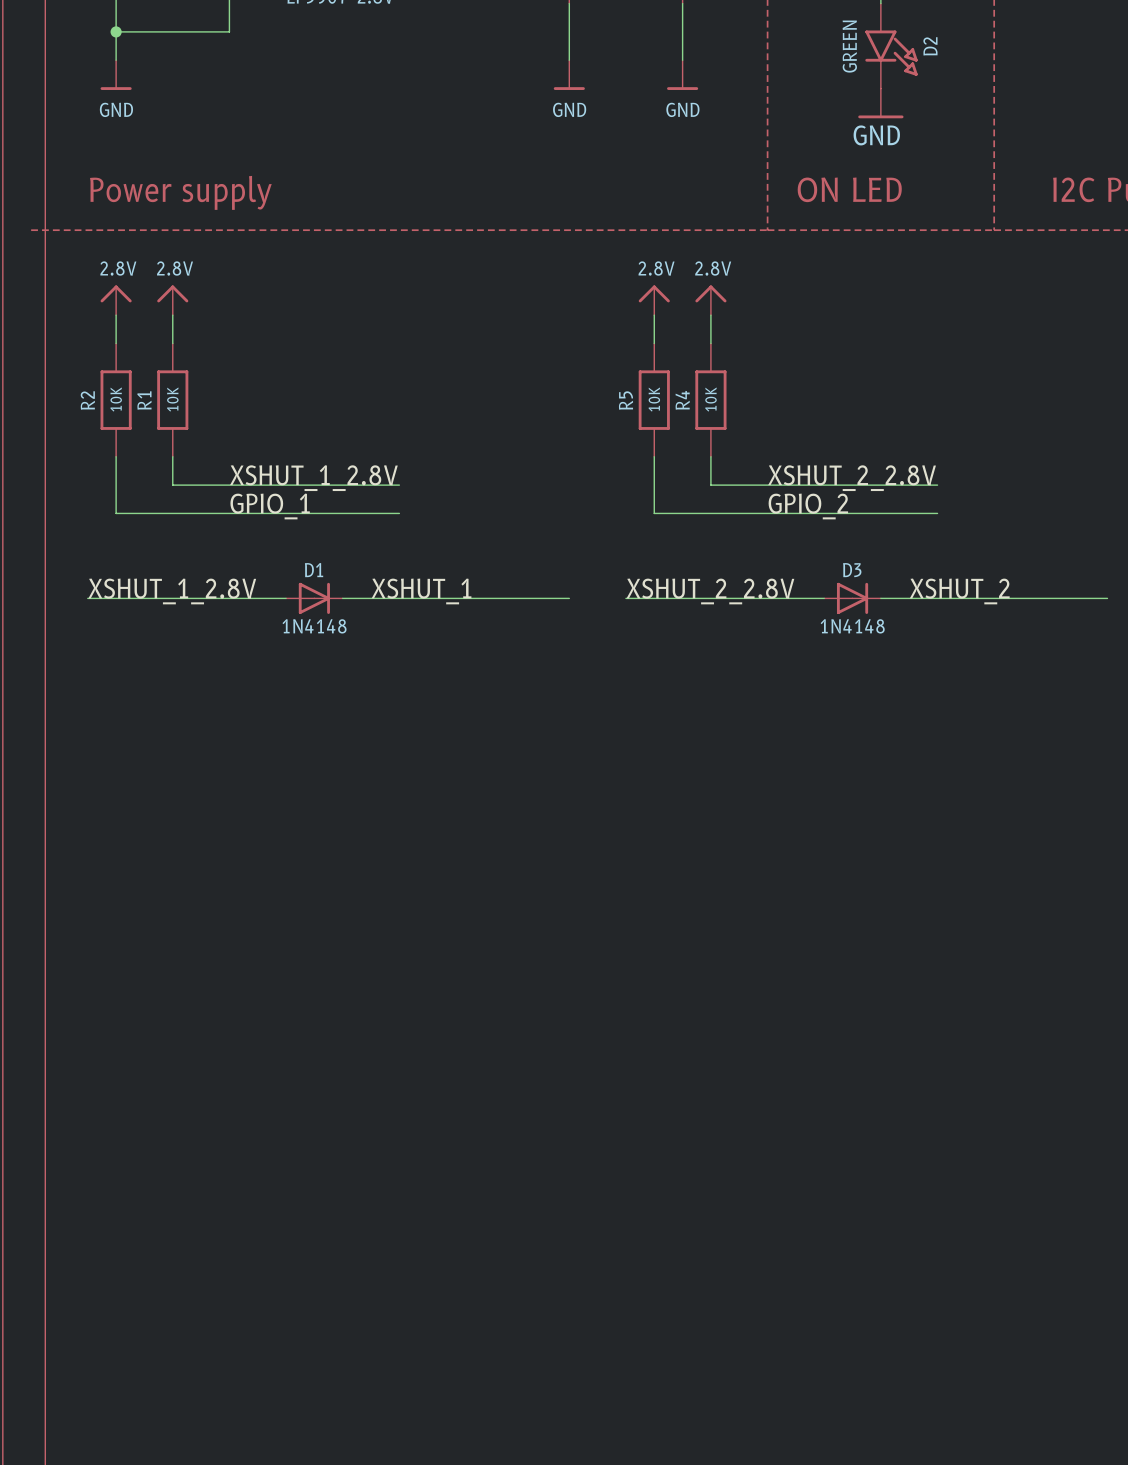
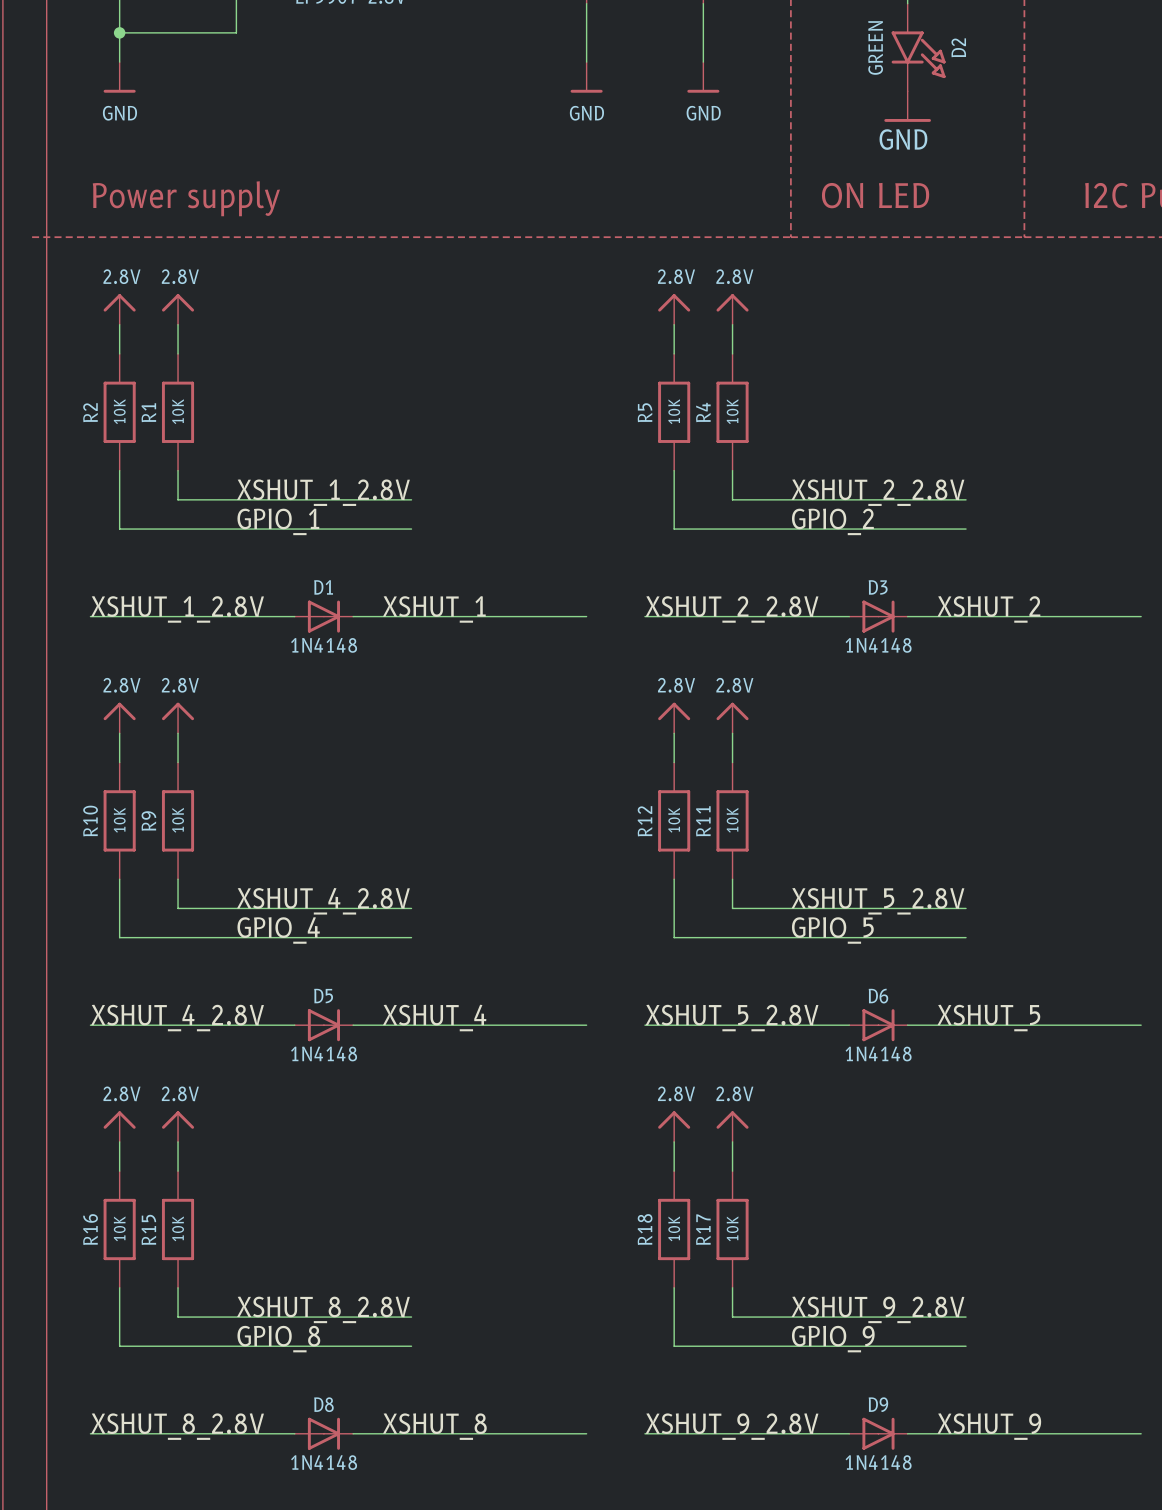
power symbol: none -> 2.8V (119, 718)
power symbol: none -> 2.8V (178, 718)
power symbol: none -> 2.8V (674, 718)
power symbol: none -> 2.8V (732, 718)
wire: none -> (119, 733) (119, 762)
wire: none -> (178, 733) (178, 762)
wire: none -> (674, 733) (674, 762)
wire: none -> (732, 733) (732, 762)
R10: none -> 10K (119, 820)
R9: none -> 10K (178, 820)
R12: none -> 10K (674, 820)
R11: none -> 10K (732, 820)
wire: none -> (119, 879) (119, 937) (411, 937)
wire: none -> (178, 879) (178, 908) (411, 908)
wire: none -> (674, 879) (674, 937) (966, 937)
wire: none -> (732, 879) (732, 908) (966, 908)
label: none -> XSHUT_4_2.8V (323, 901)
label: none -> XSHUT_5_2.8V (877, 901)
label: none -> GPIO_4 (278, 930)
label: none -> GPIO_5 (832, 930)
label: none -> XSHUT_4_2.8V (177, 1018)
label: none -> XSHUT_4 (434, 1018)
label: none -> XSHUT_5_2.8V (732, 1018)
label: none -> XSHUT_5 (988, 1018)
wire: none -> (90, 1025) (294, 1025)
D5: none -> 1N4148 (323, 1025)
wire: none -> (353, 1025) (586, 1025)
wire: none -> (644, 1025) (849, 1025)
D6: none -> 1N4148 (878, 1025)
wire: none -> (907, 1025) (1141, 1025)
power symbol: none -> 2.8V (119, 1126)
power symbol: none -> 2.8V (178, 1126)
power symbol: none -> 2.8V (674, 1126)
power symbol: none -> 2.8V (732, 1126)
wire: none -> (119, 1141) (119, 1171)
wire: none -> (178, 1141) (178, 1171)
wire: none -> (674, 1141) (674, 1171)
wire: none -> (732, 1141) (732, 1171)
R16: none -> 10K (119, 1229)
R15: none -> 10K (178, 1229)
R18: none -> 10K (674, 1229)
R17: none -> 10K (732, 1229)
wire: none -> (119, 1287) (119, 1346) (411, 1346)
wire: none -> (178, 1287) (178, 1317) (411, 1317)
wire: none -> (674, 1287) (674, 1346) (966, 1346)
wire: none -> (732, 1287) (732, 1317) (966, 1317)
label: none -> XSHUT_8_2.8V (323, 1309)
label: none -> XSHUT_9_2.8V (877, 1309)
label: none -> GPIO_8 (278, 1339)
label: none -> GPIO_9 (833, 1339)
label: none -> XSHUT_8_2.8V (177, 1426)
label: none -> XSHUT_8 (434, 1426)
label: none -> XSHUT_9_2.8V (732, 1426)
label: none -> XSHUT_9 (989, 1426)
wire: none -> (90, 1433) (294, 1433)
D8: none -> 1N4148 (323, 1433)
wire: none -> (353, 1433) (586, 1433)
wire: none -> (644, 1433) (849, 1433)
D9: none -> 1N4148 (878, 1433)
wire: none -> (907, 1433) (1141, 1433)

